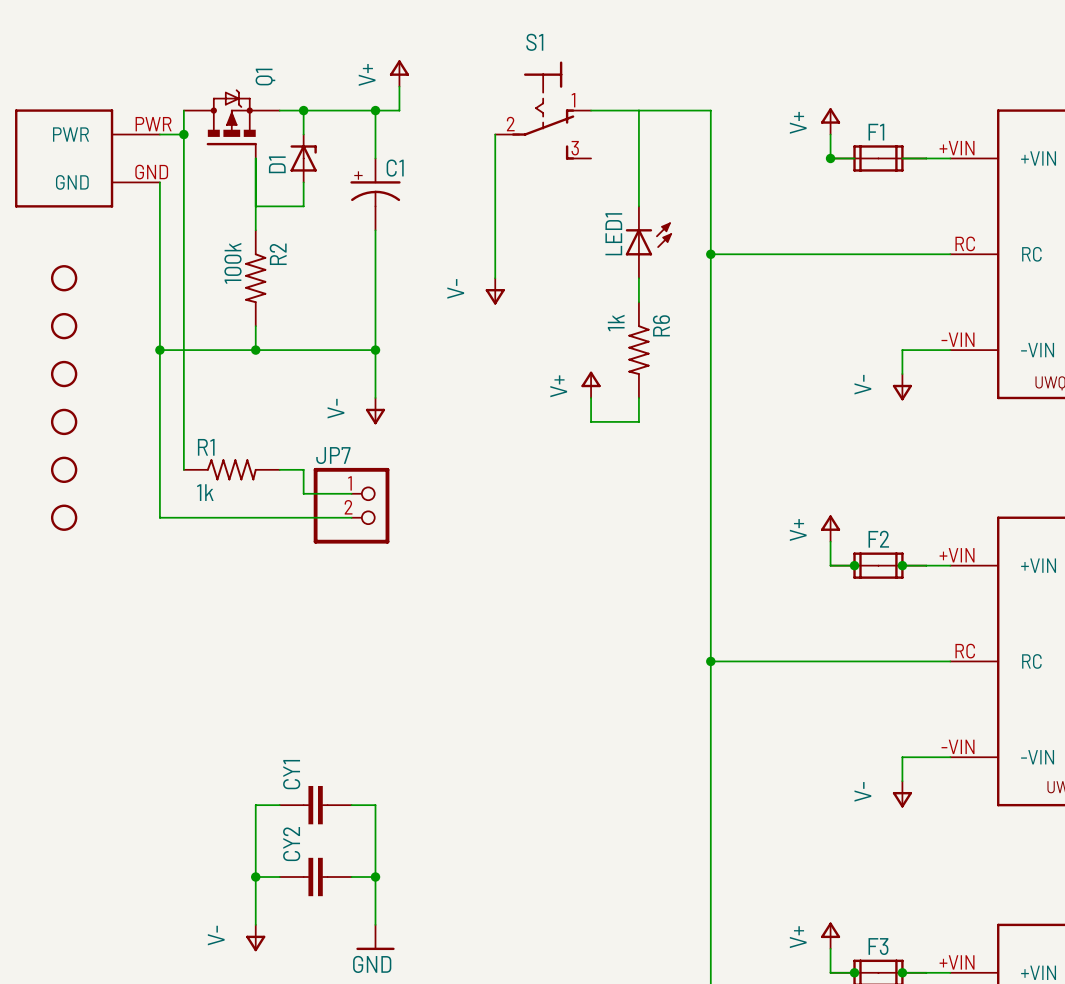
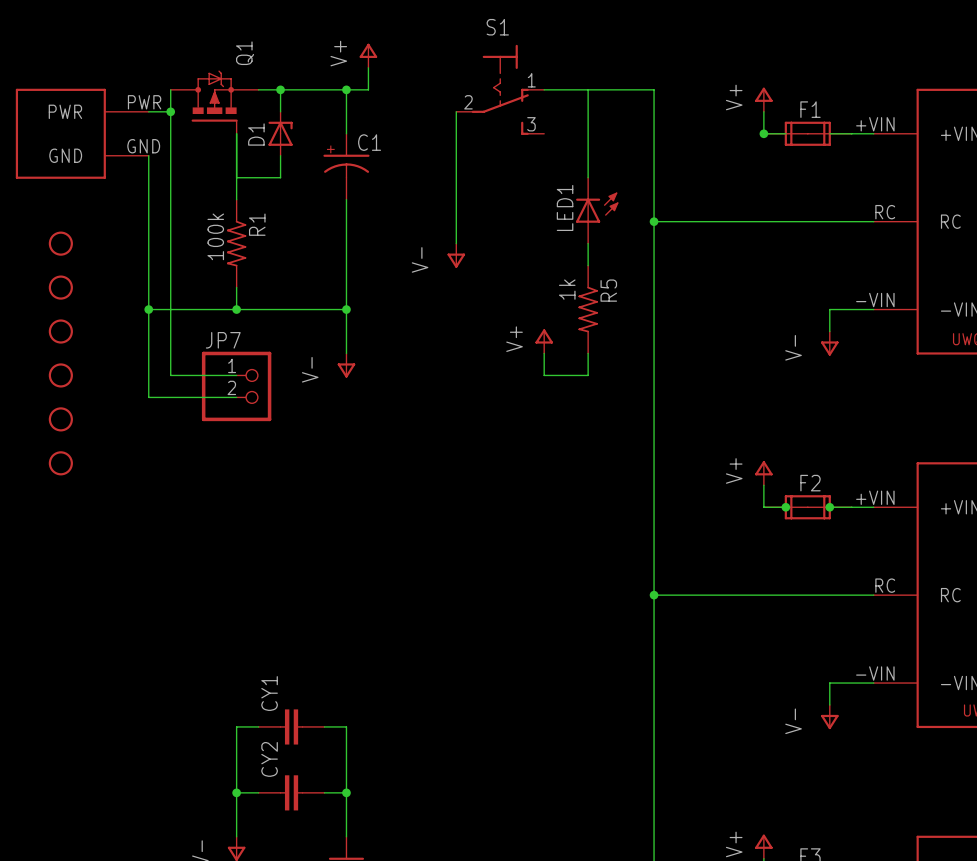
R2 name: R2 (278, 254) -> R1 (257, 224)
R6 name: R6 (661, 325) -> R5 (608, 290)
wire: (183, 421) (183, 469) -> (170, 375) (236, 375)
wire: (159, 445) (159, 517) (351, 517) -> (148, 397) (236, 397)
R1: 1k (231, 469) -> none
wire: (279, 469) (303, 469) (303, 493) (351, 493) -> none
JP7 position: (351, 505) -> (236, 386)

